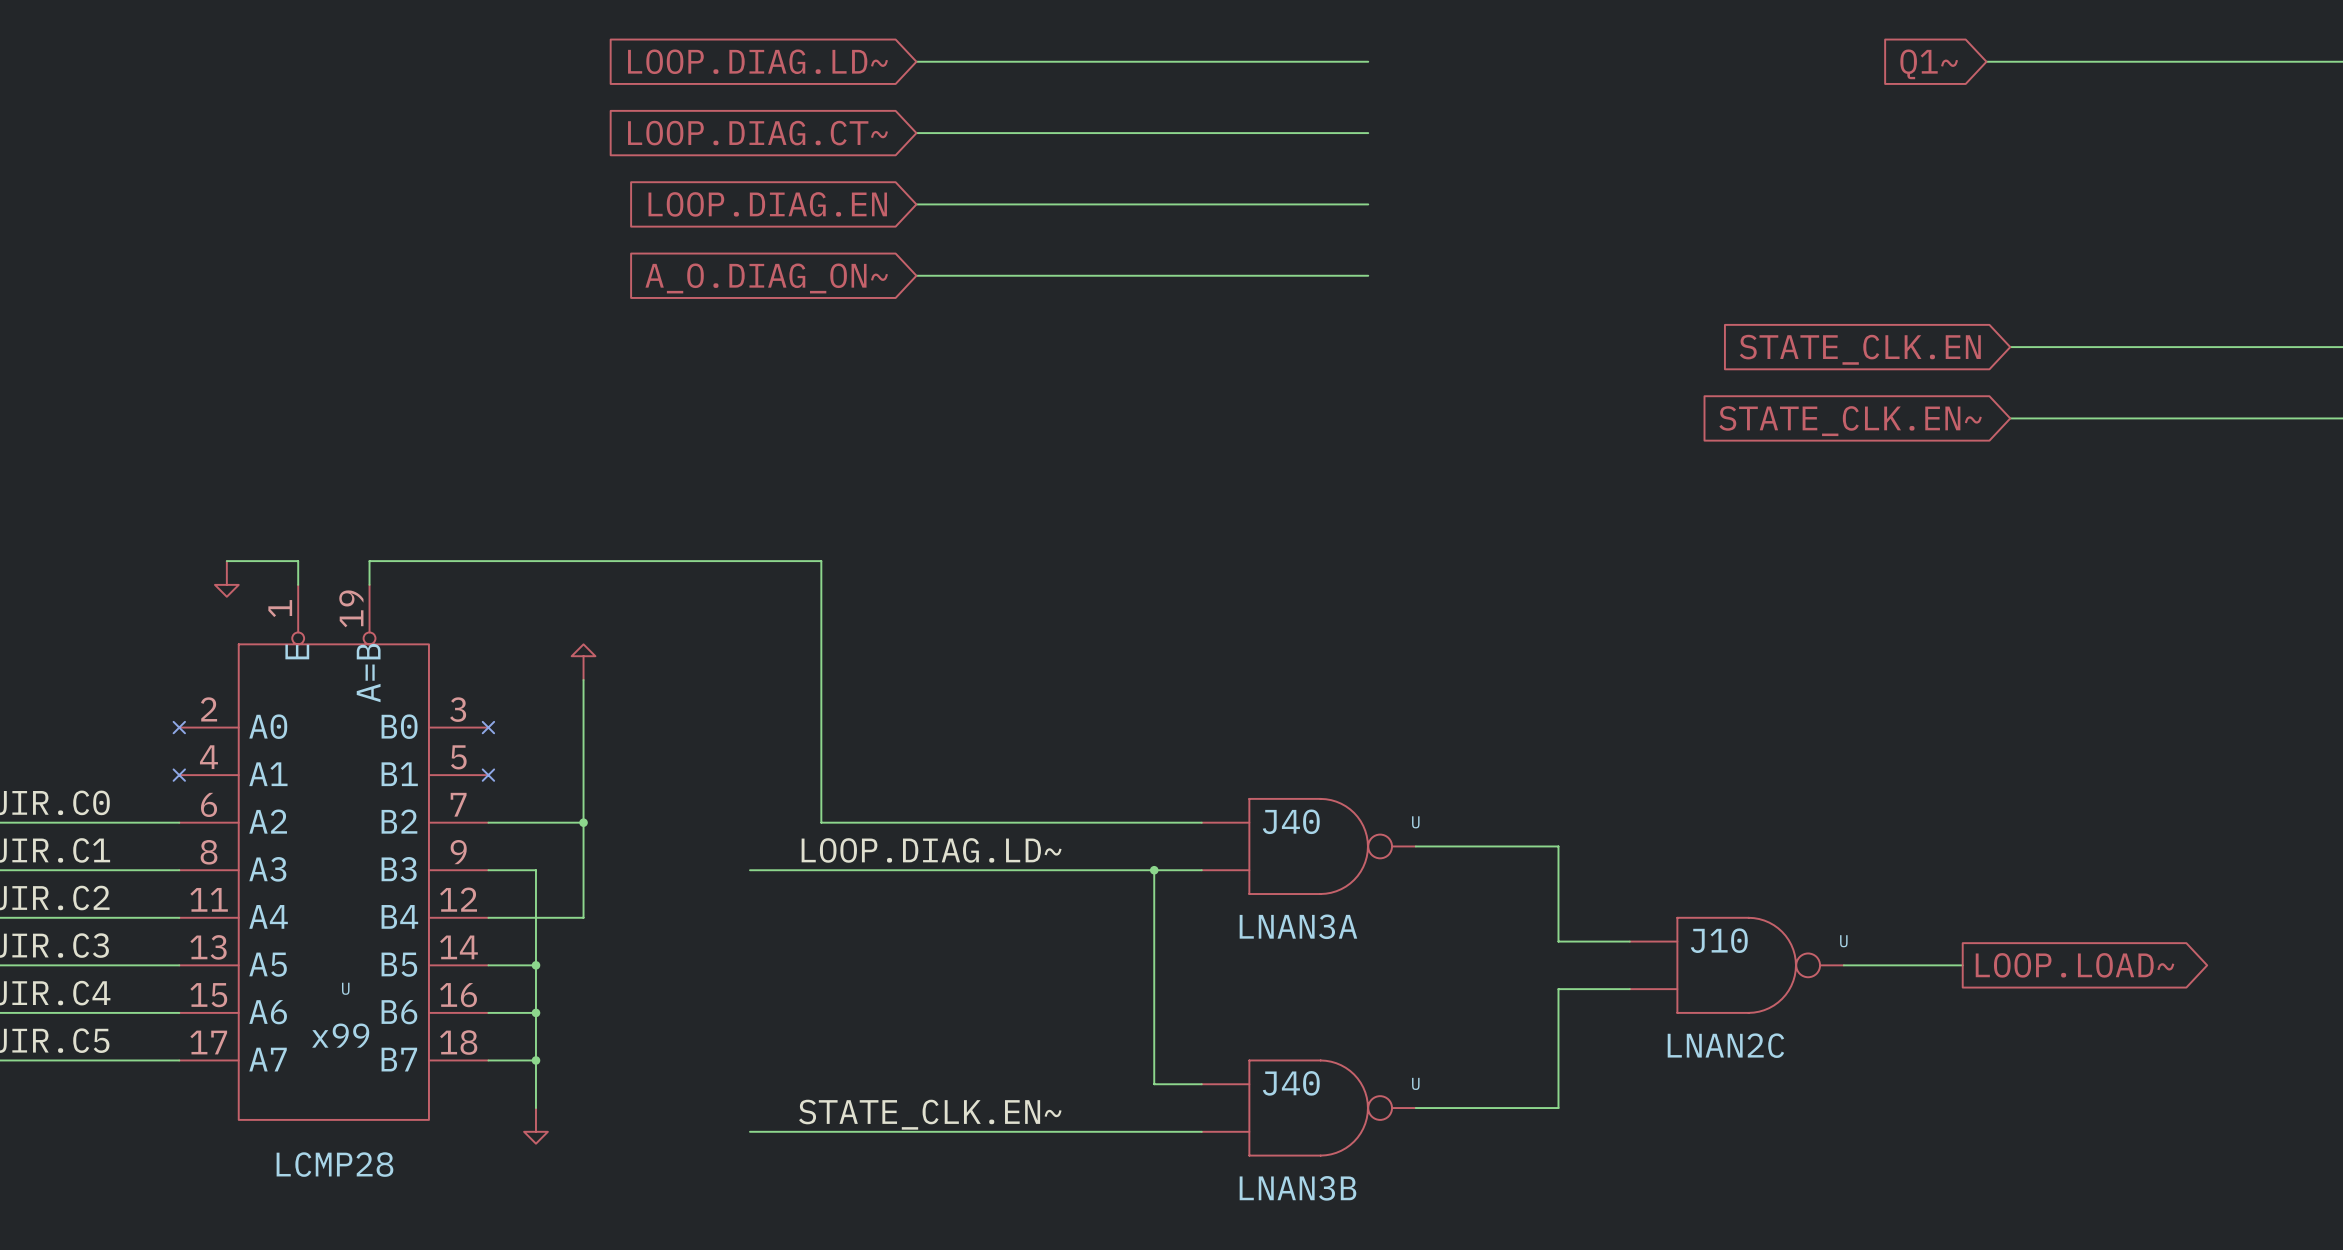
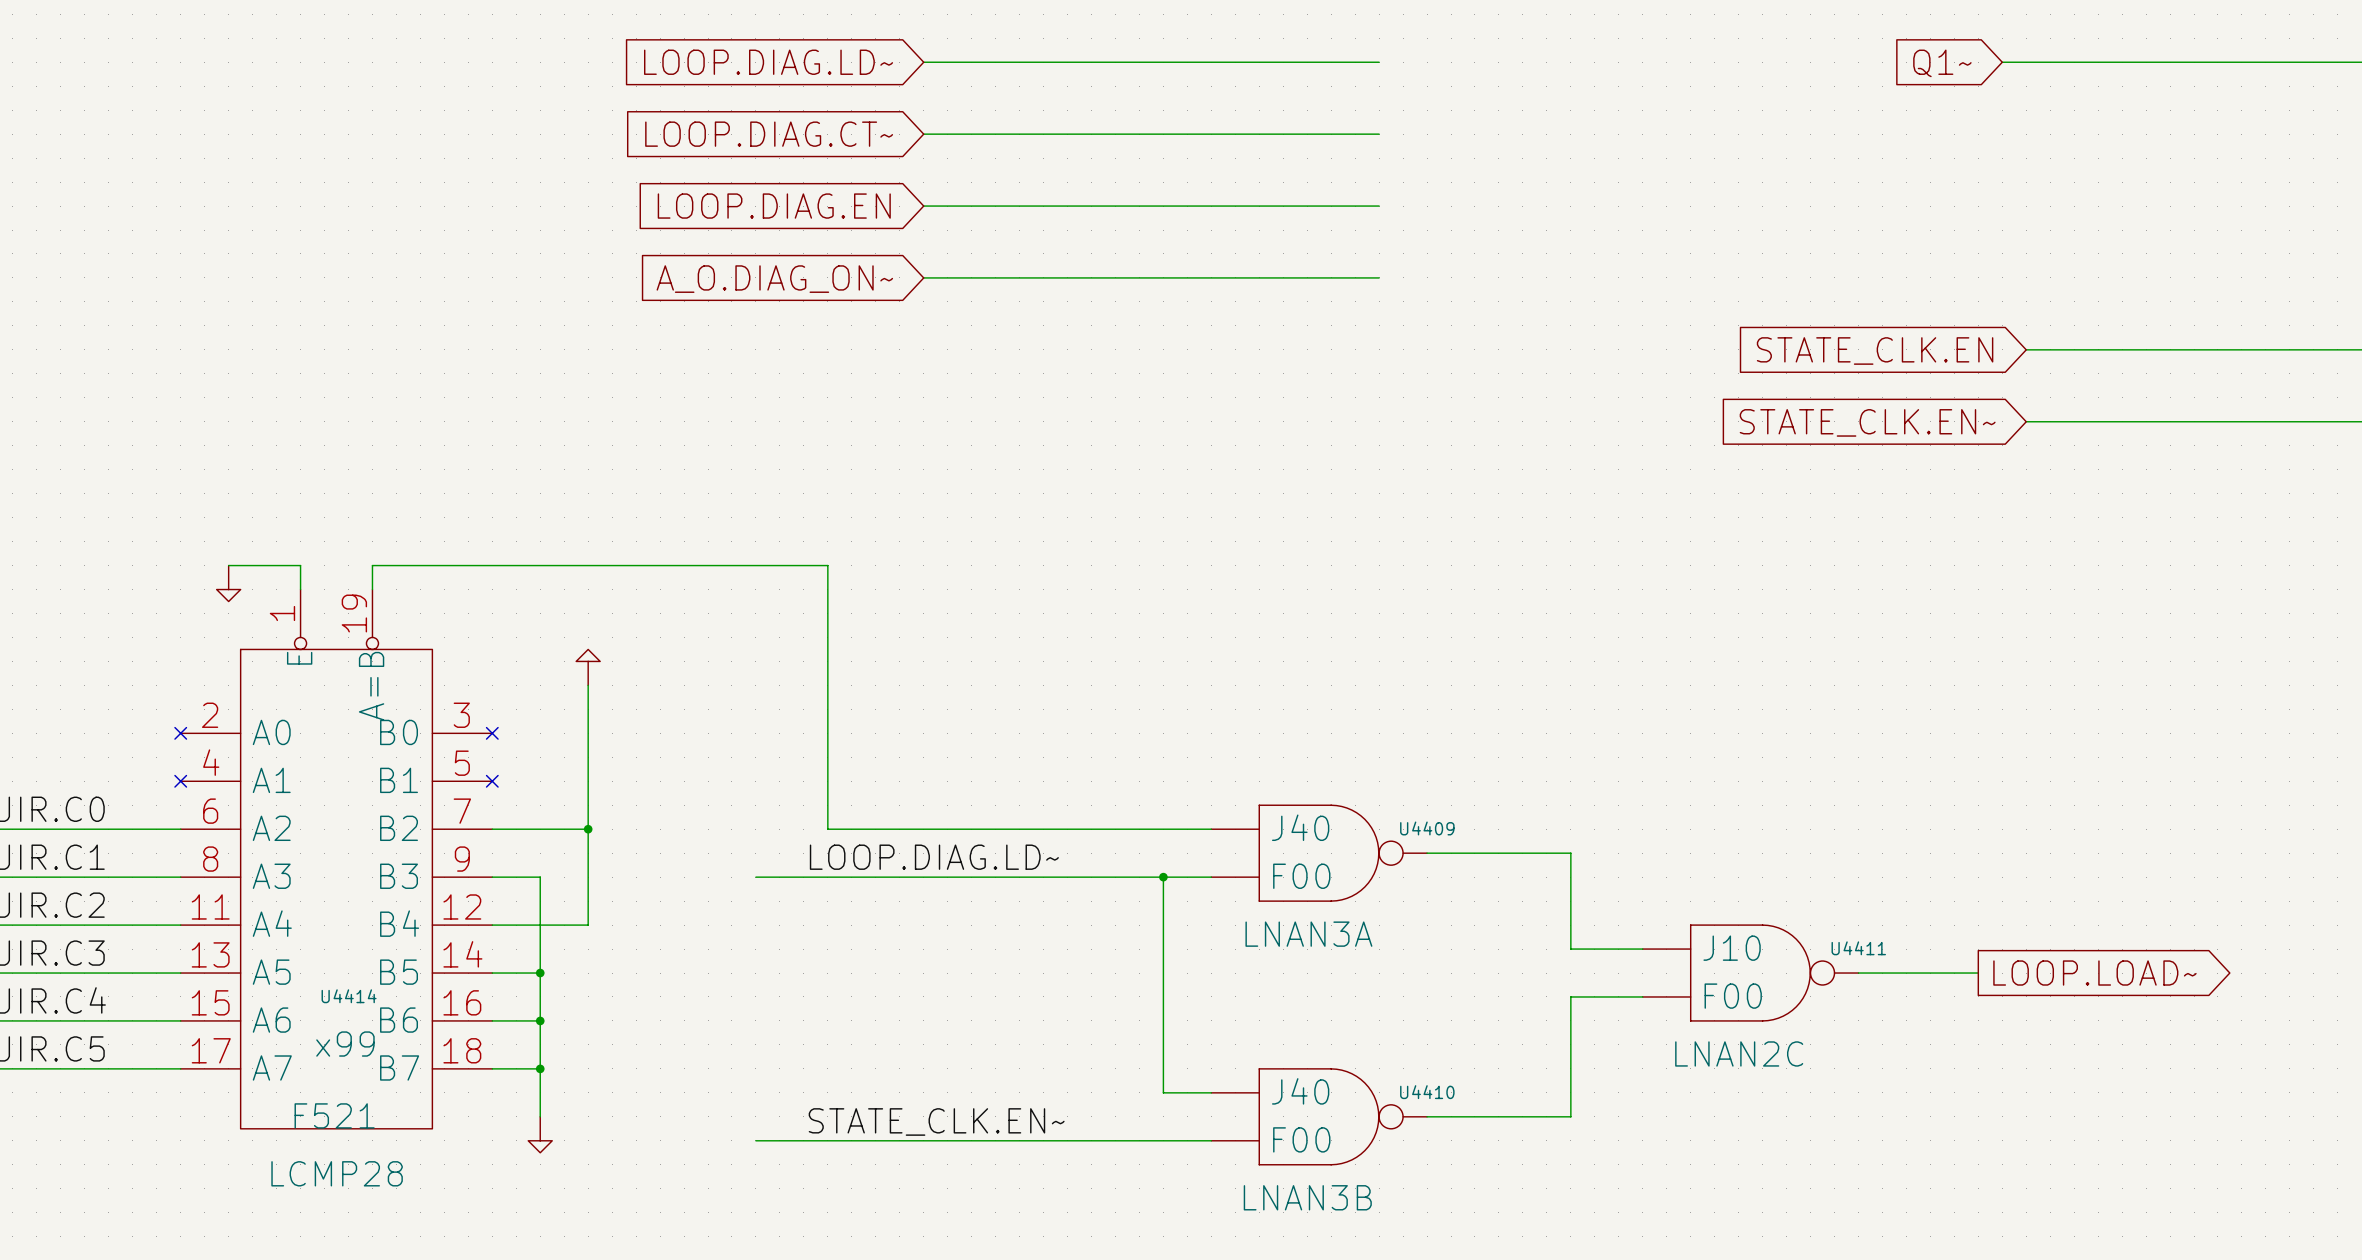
U name: U (1415, 822) -> U4409 (1427, 828)
U value: none -> F00 (1301, 876)
U name: U (1843, 941) -> U4411 (1858, 948)
U name: U (345, 988) -> U4414 (349, 996)
U value: none -> F00 (1733, 996)
U name: U (1415, 1083) -> U4410 (1427, 1092)
U value: none -> F521 (334, 1115)
U value: none -> F00 (1301, 1139)

